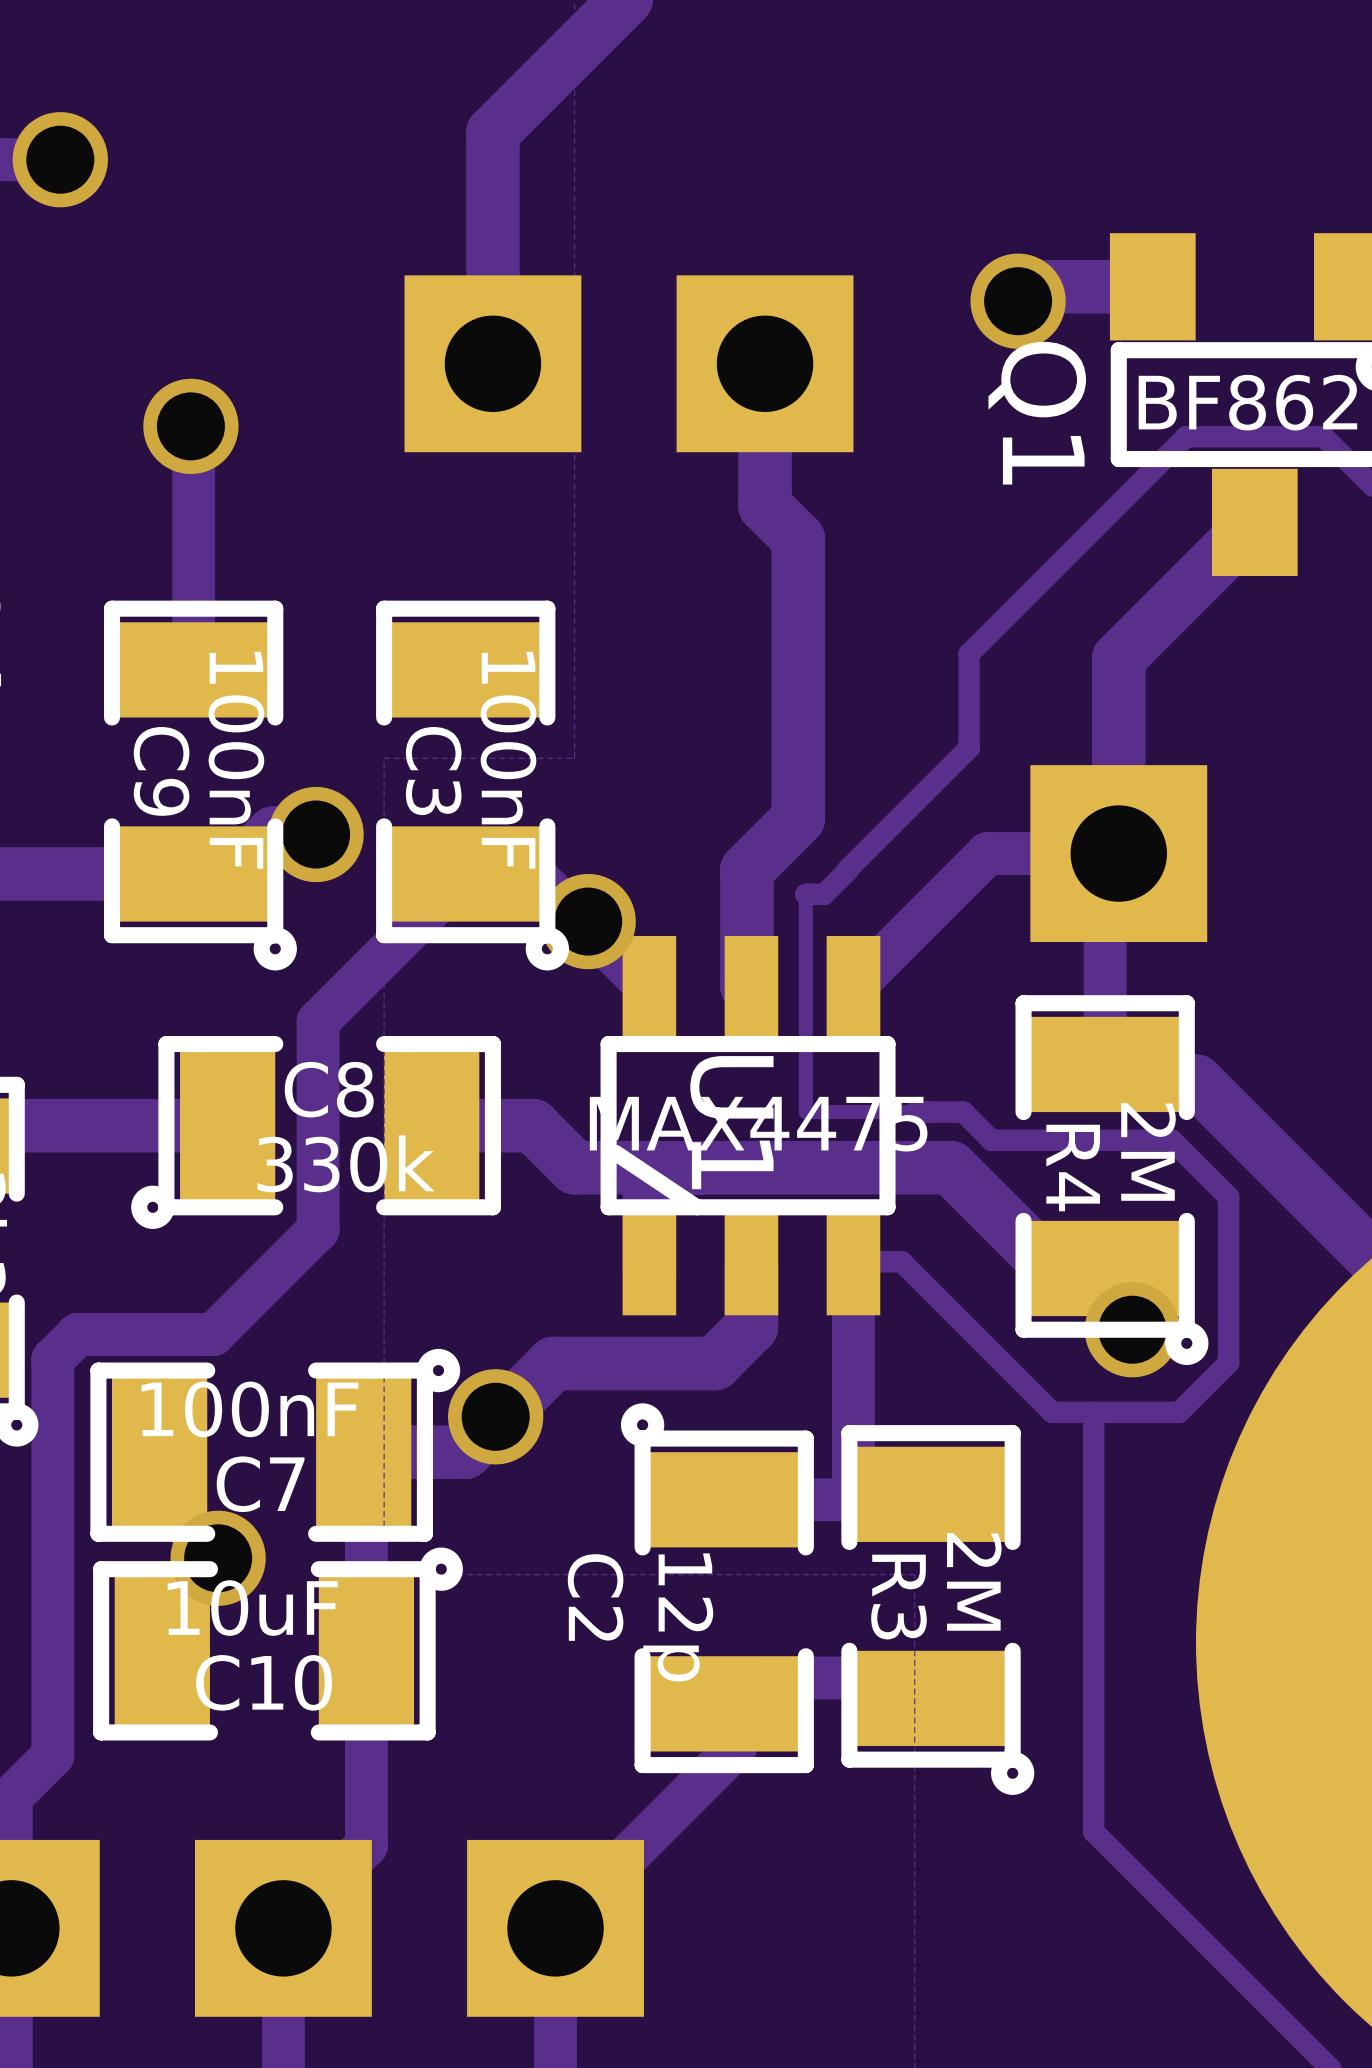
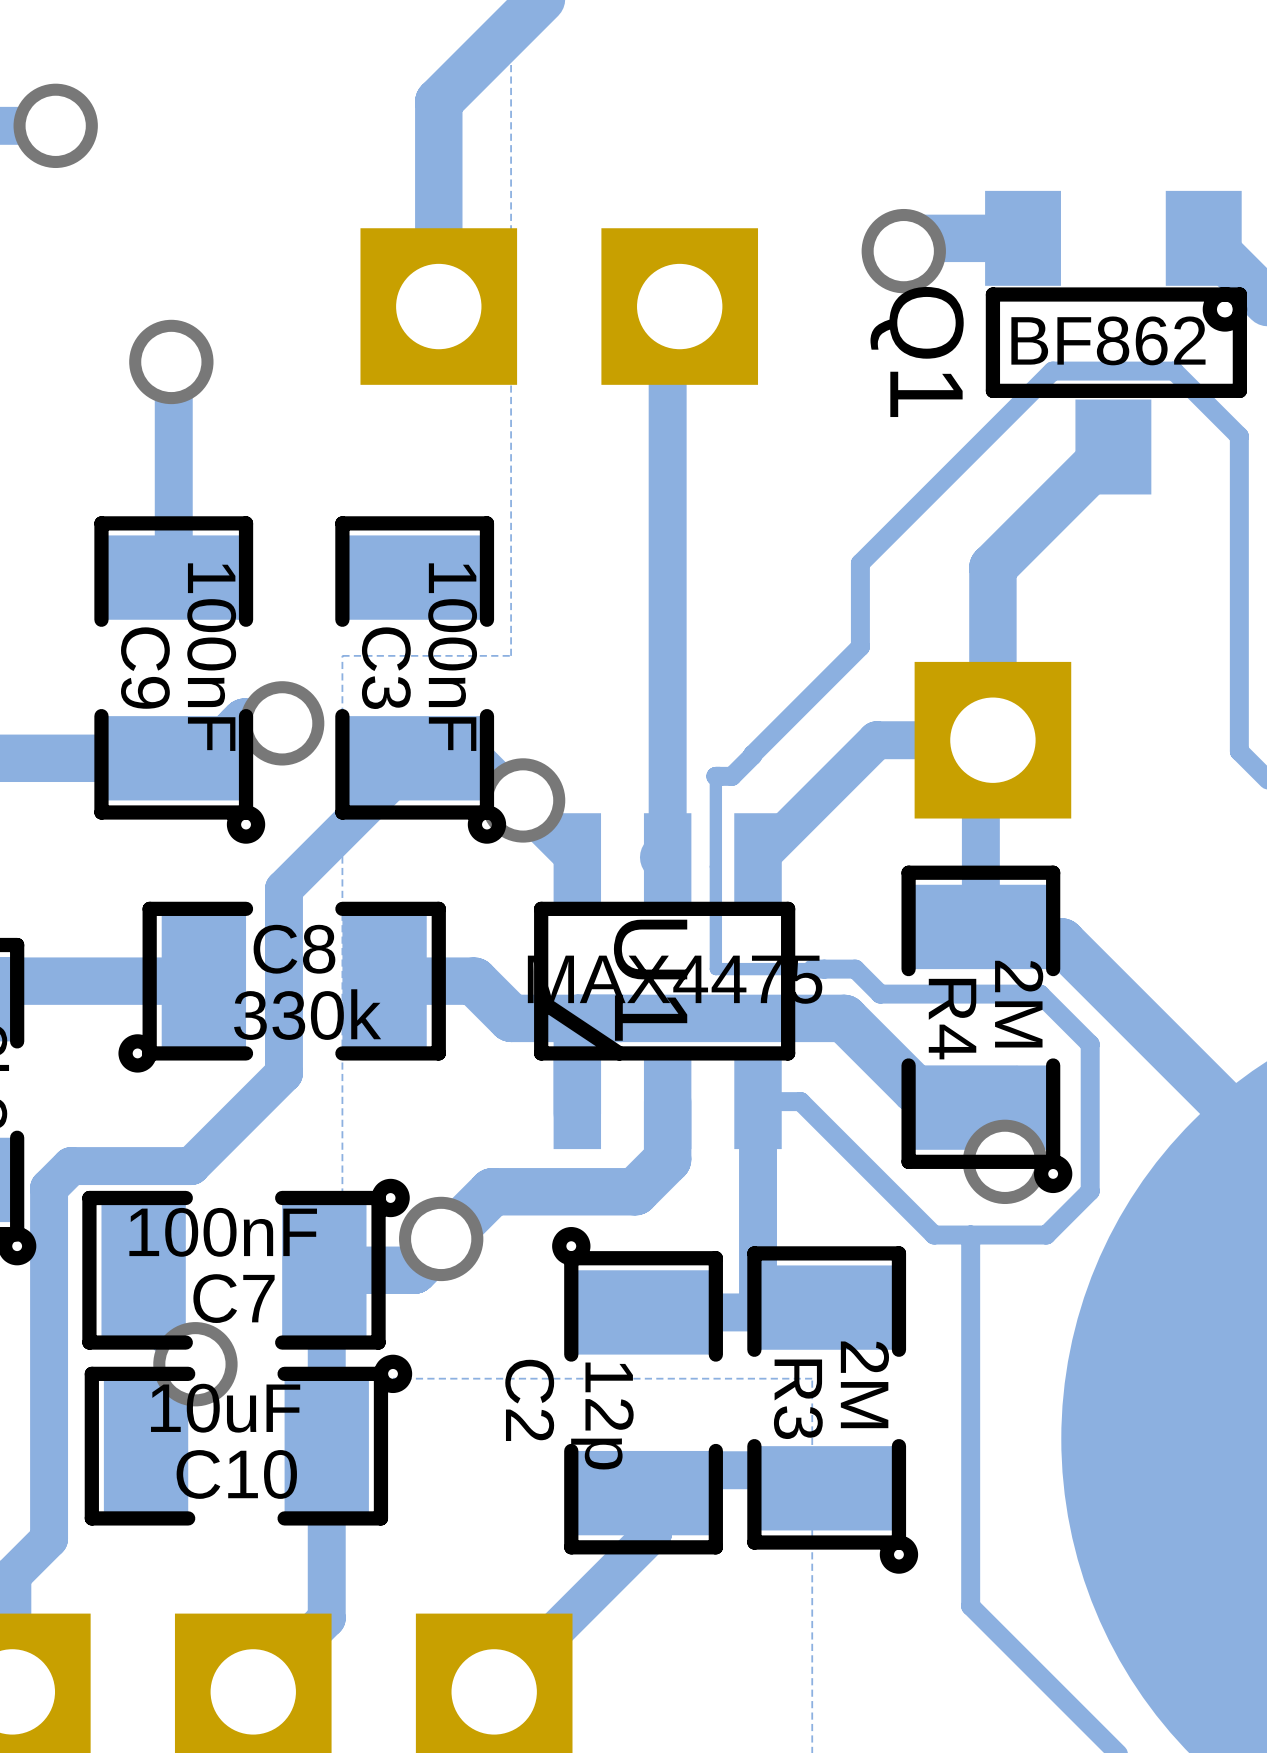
track: (765, 363) (765, 505) (798, 539) (798, 818) (746, 869) (746, 985) -> (679, 306) (667, 318) (667, 860)

